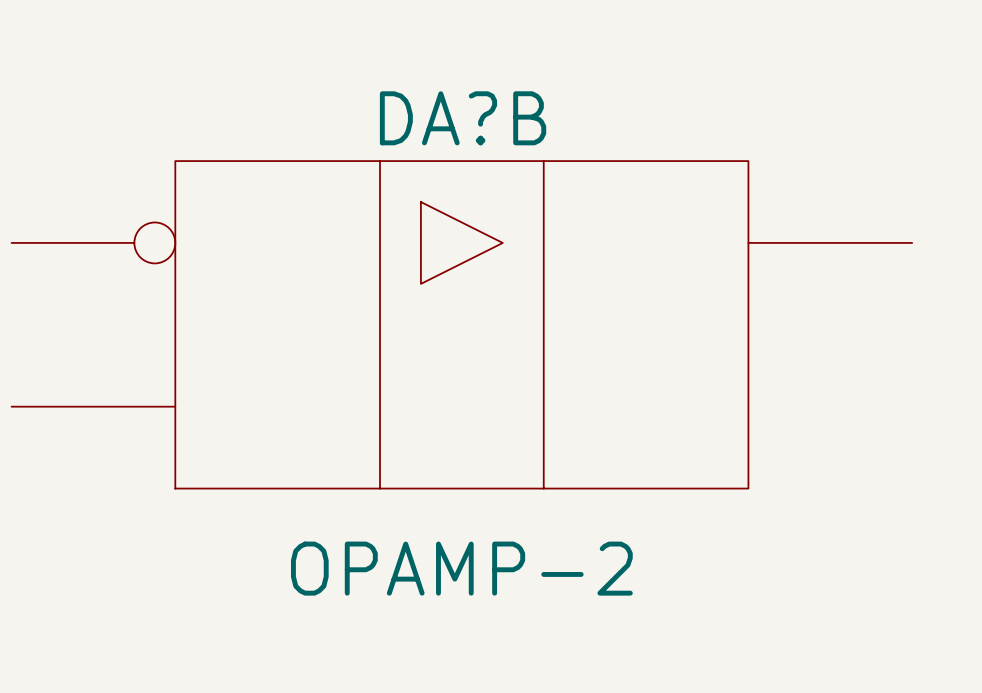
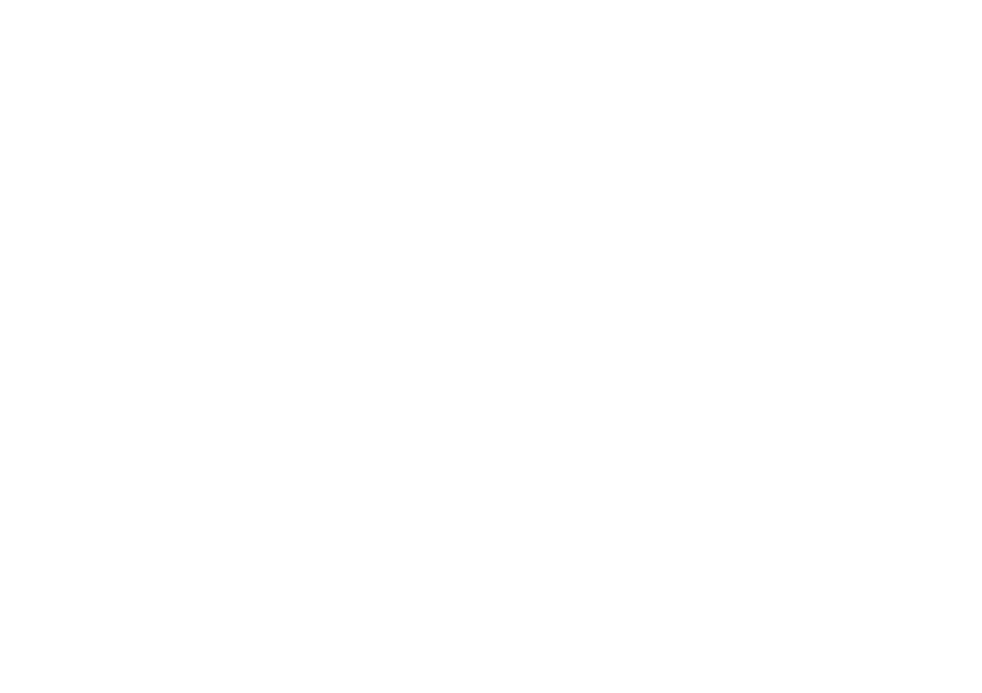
DA?B: OPAMP-2 (461, 324) -> none

